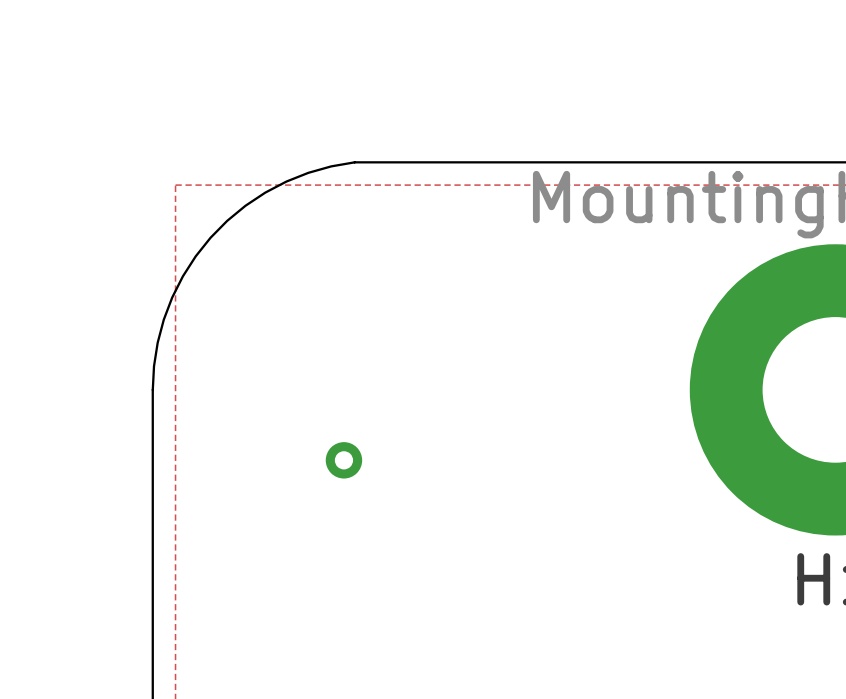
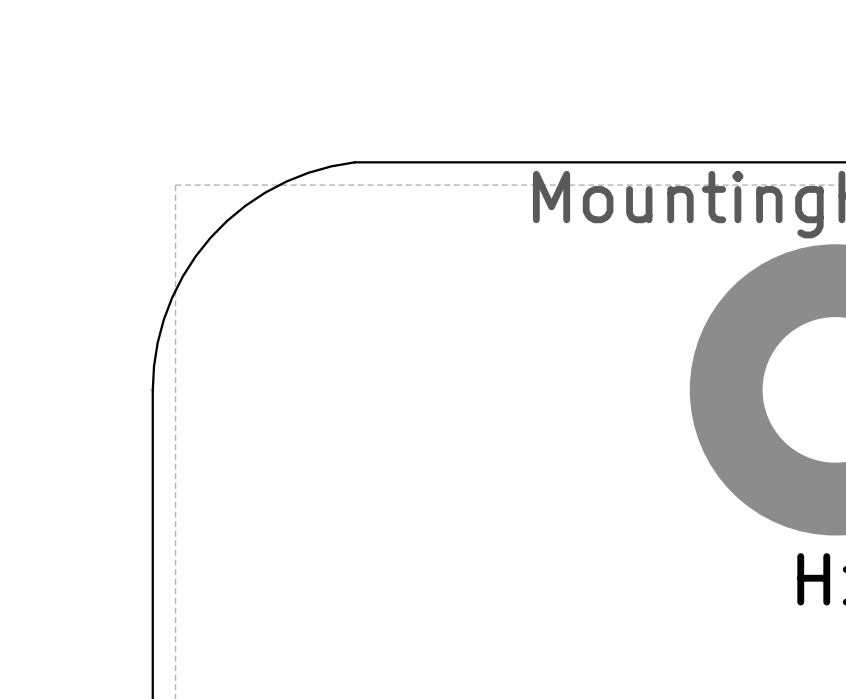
via: (343, 460) -> none

